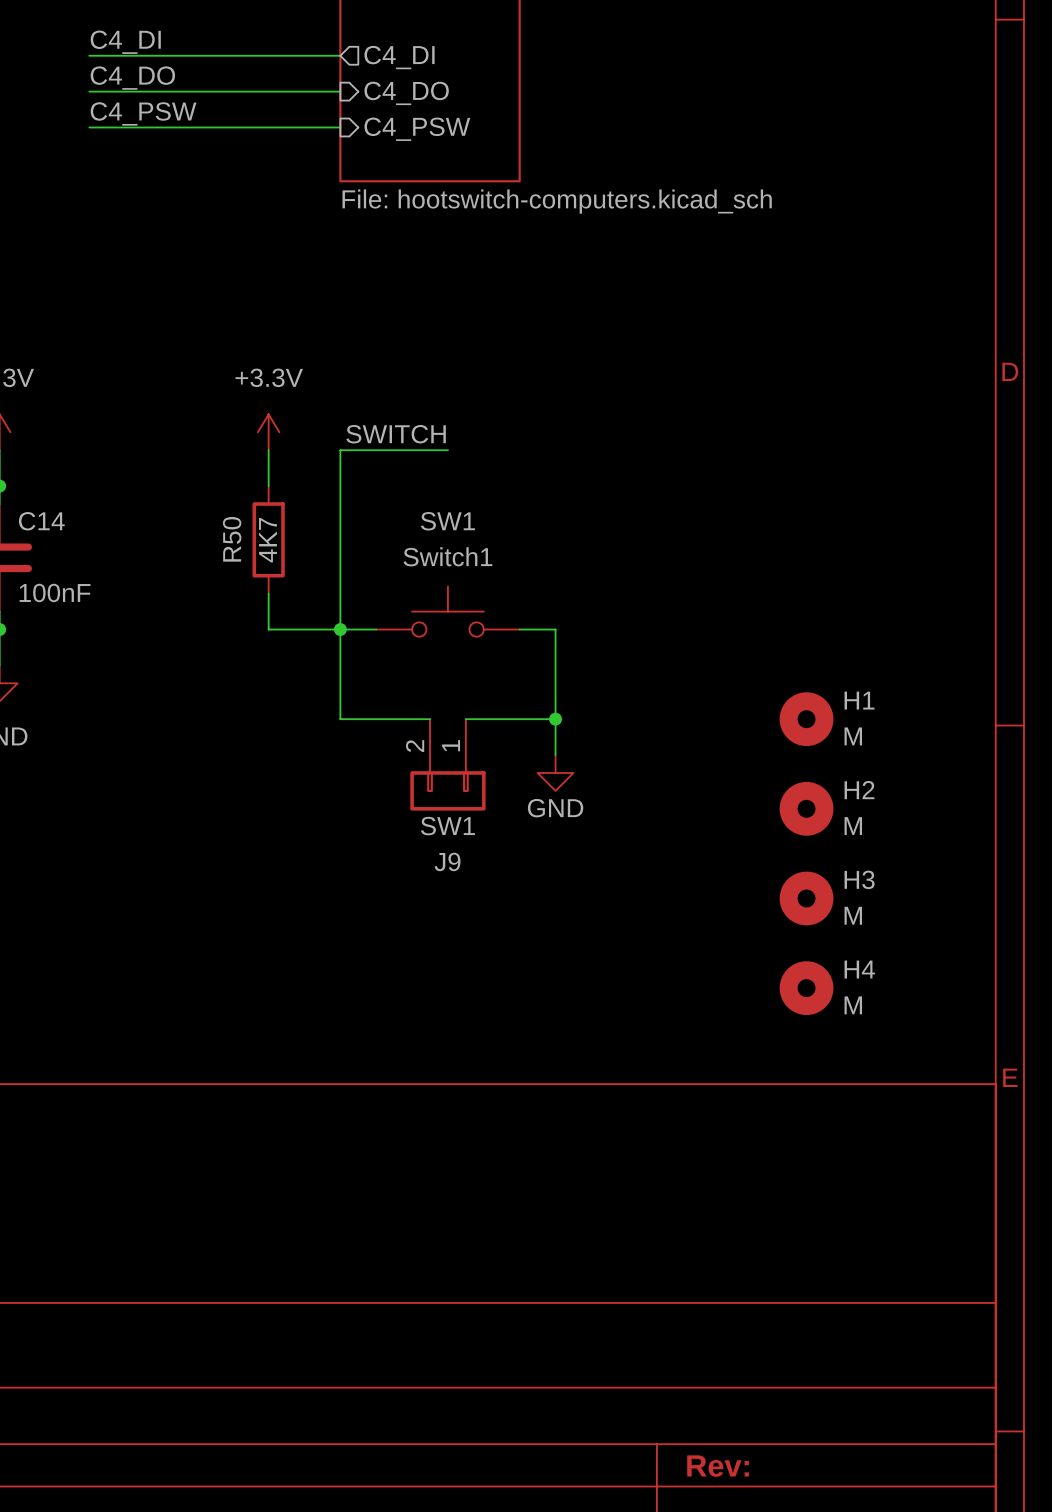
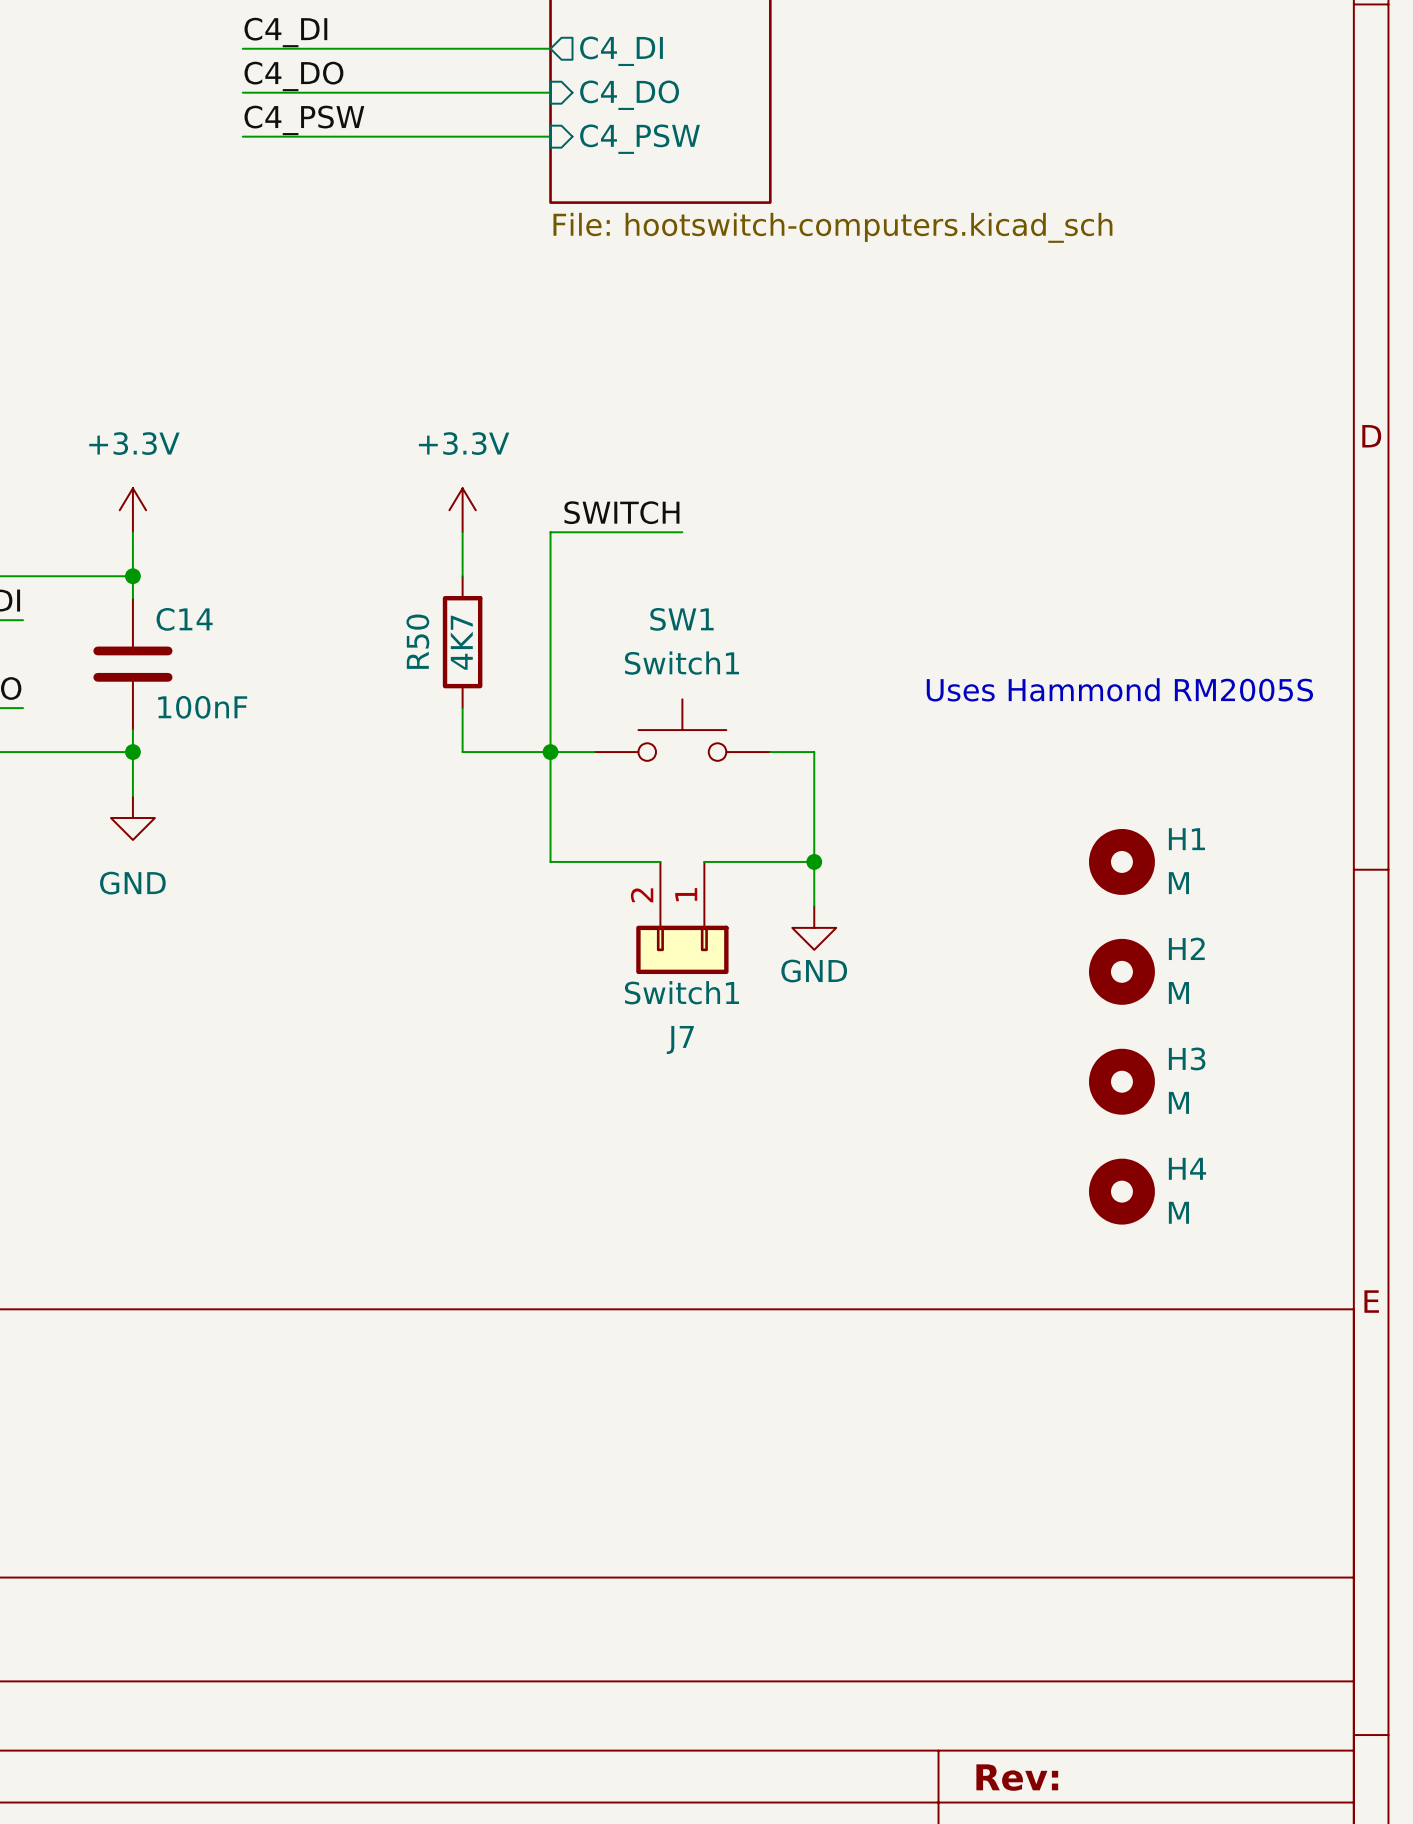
text: none -> Uses Hammond RM2005S (1119, 689)
J9 value: SW1 (447, 826) -> Switch1 (681, 992)
J9 name: J9 (447, 861) -> J7 (680, 1039)

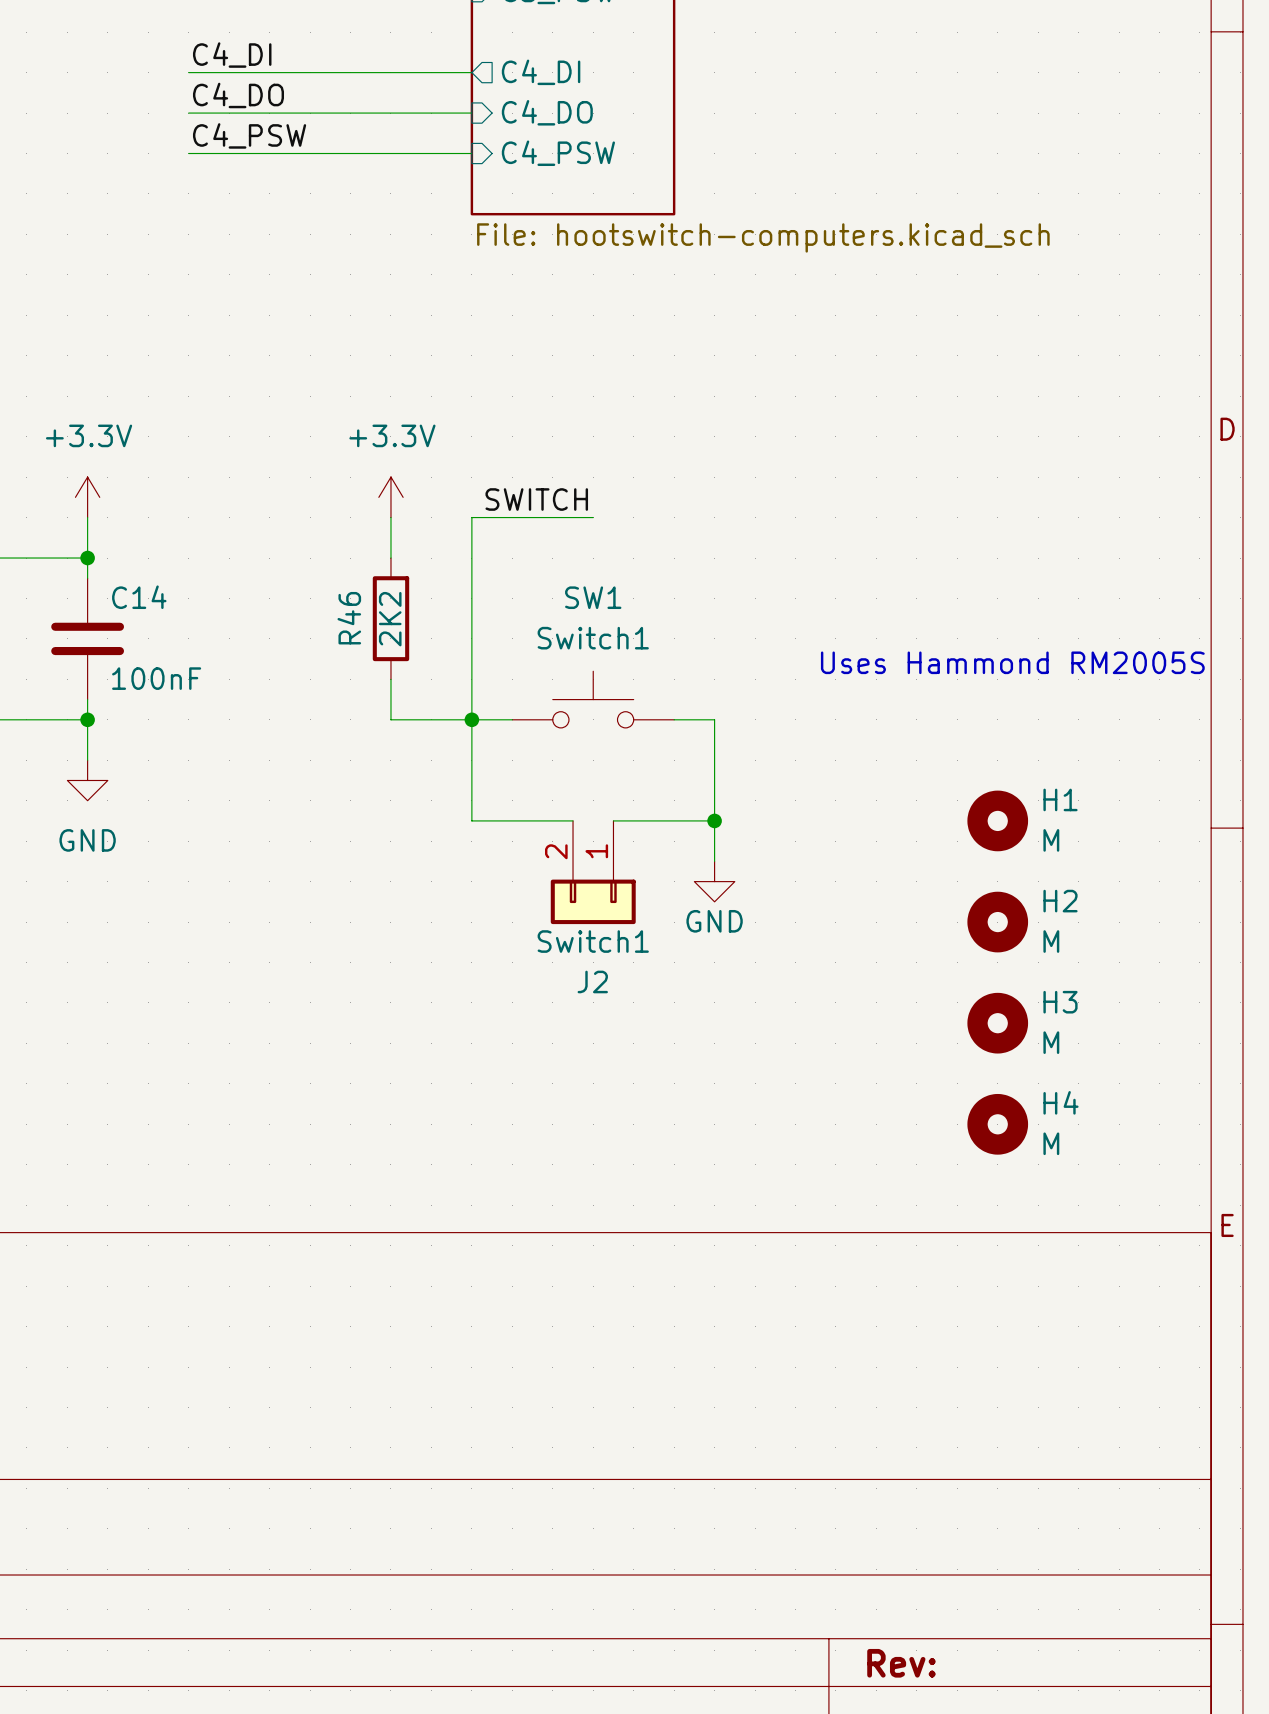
R50 name: R50 (417, 641) -> R46 (349, 618)
R50 value: 4K7 (461, 642) -> 2K2 (390, 619)
J7 name: J7 (680, 1039) -> J2 (592, 981)

